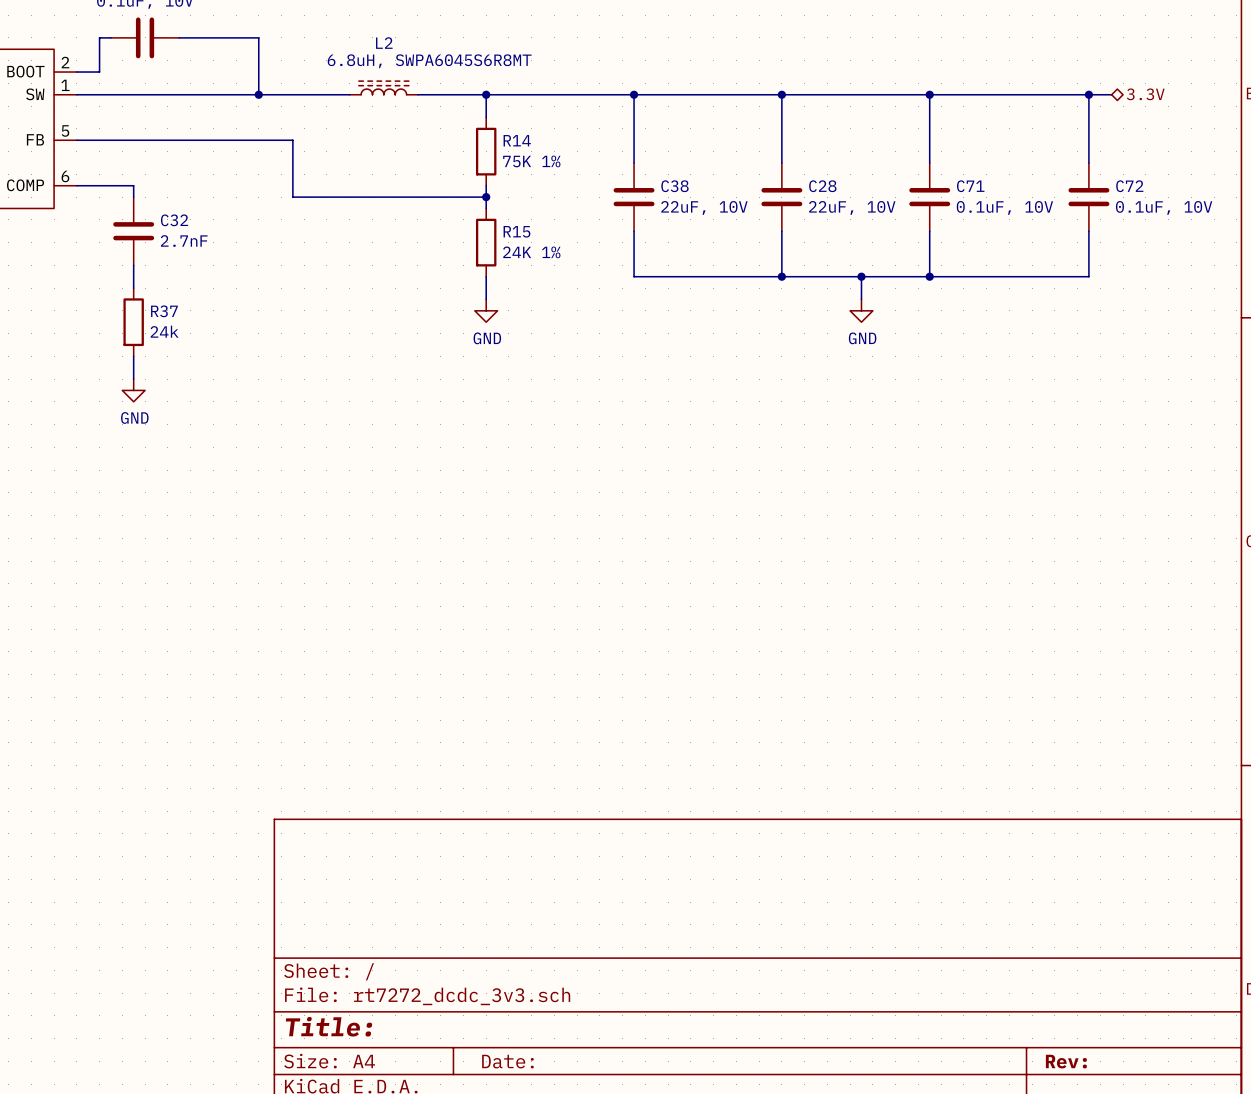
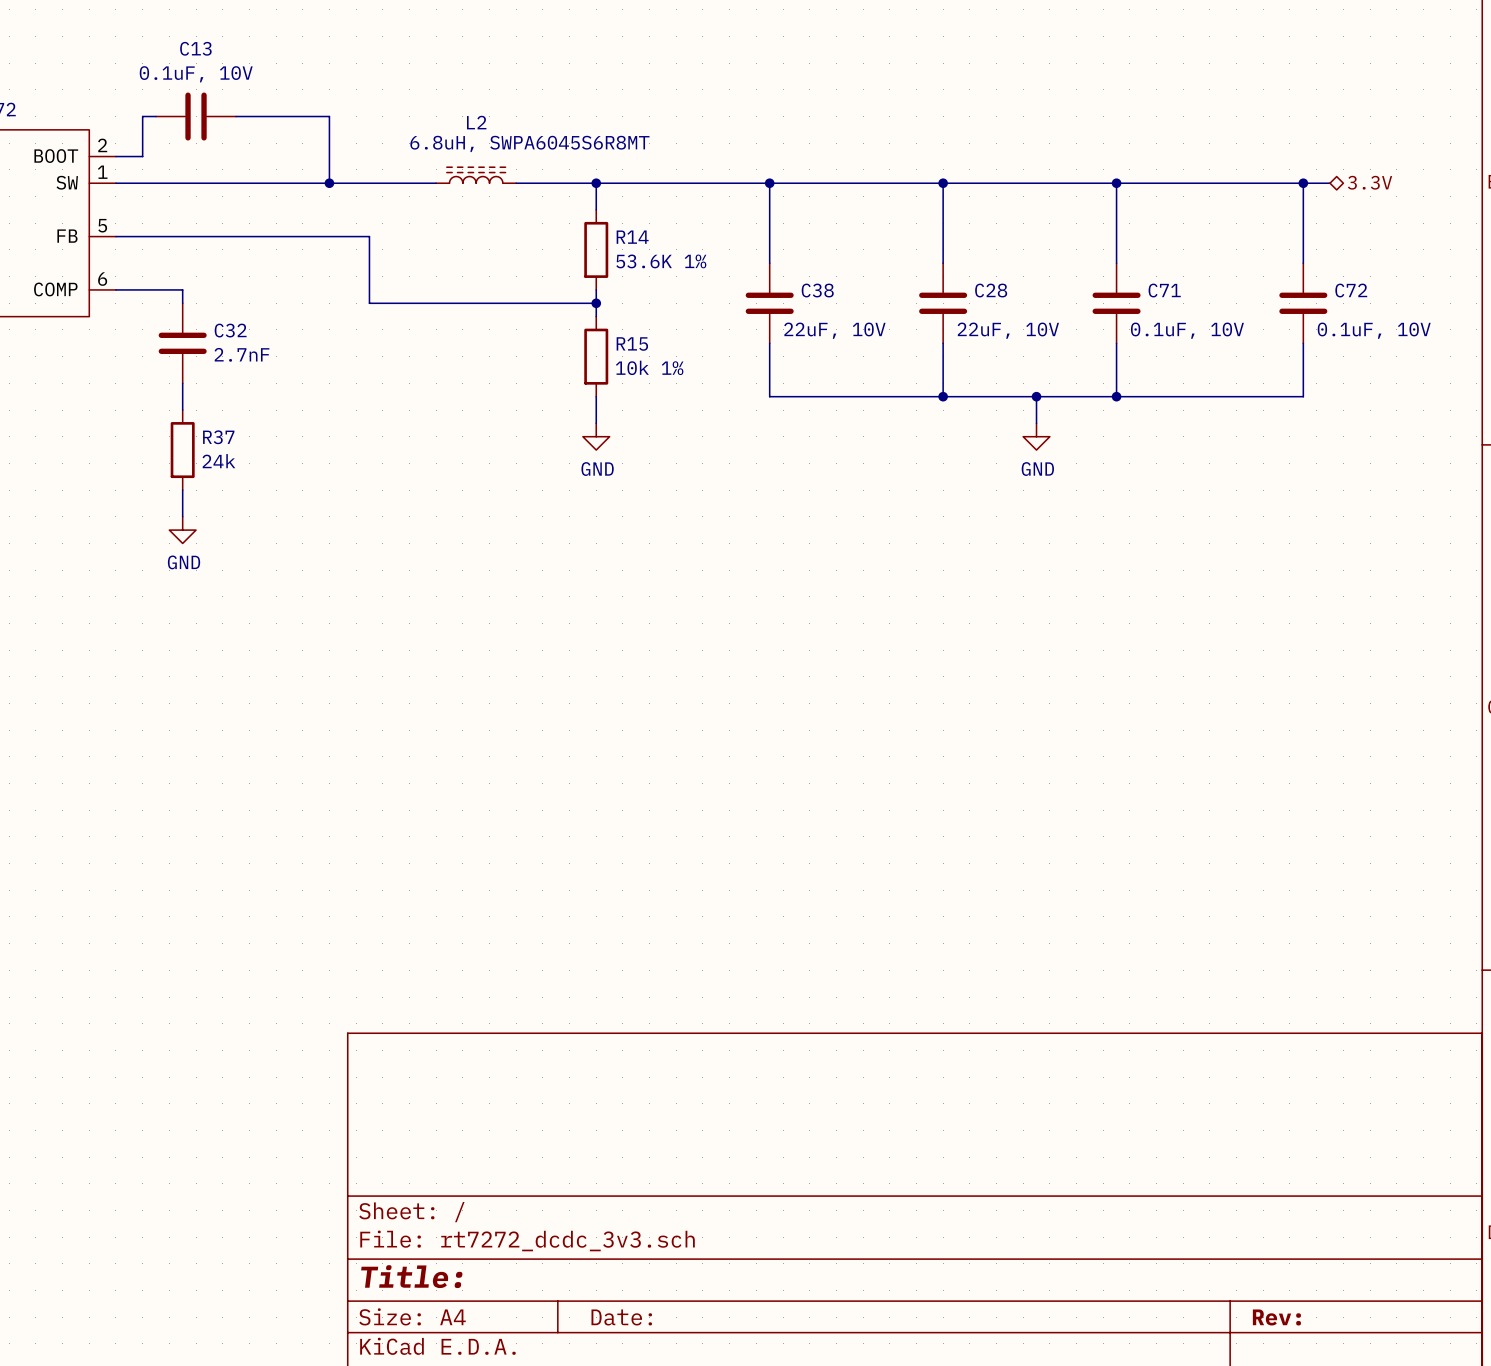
R14 value: 75K 1% (531, 161) -> 53.6K 1% (661, 261)
C38 value position: 22uF, 10V (704, 207) -> 22uF, 10V (834, 330)
C28 value position: 22uF, 10V (852, 207) -> 22uF, 10V (1008, 330)
C71 value position: 0.1uF, 10V (1004, 207) -> 0.1uF, 10V (1187, 330)
C72 value position: 0.1uF, 10V (1164, 207) -> 0.1uF, 10V (1374, 330)
R15 value: 24K 1% (531, 252) -> 10k 1% (649, 367)

